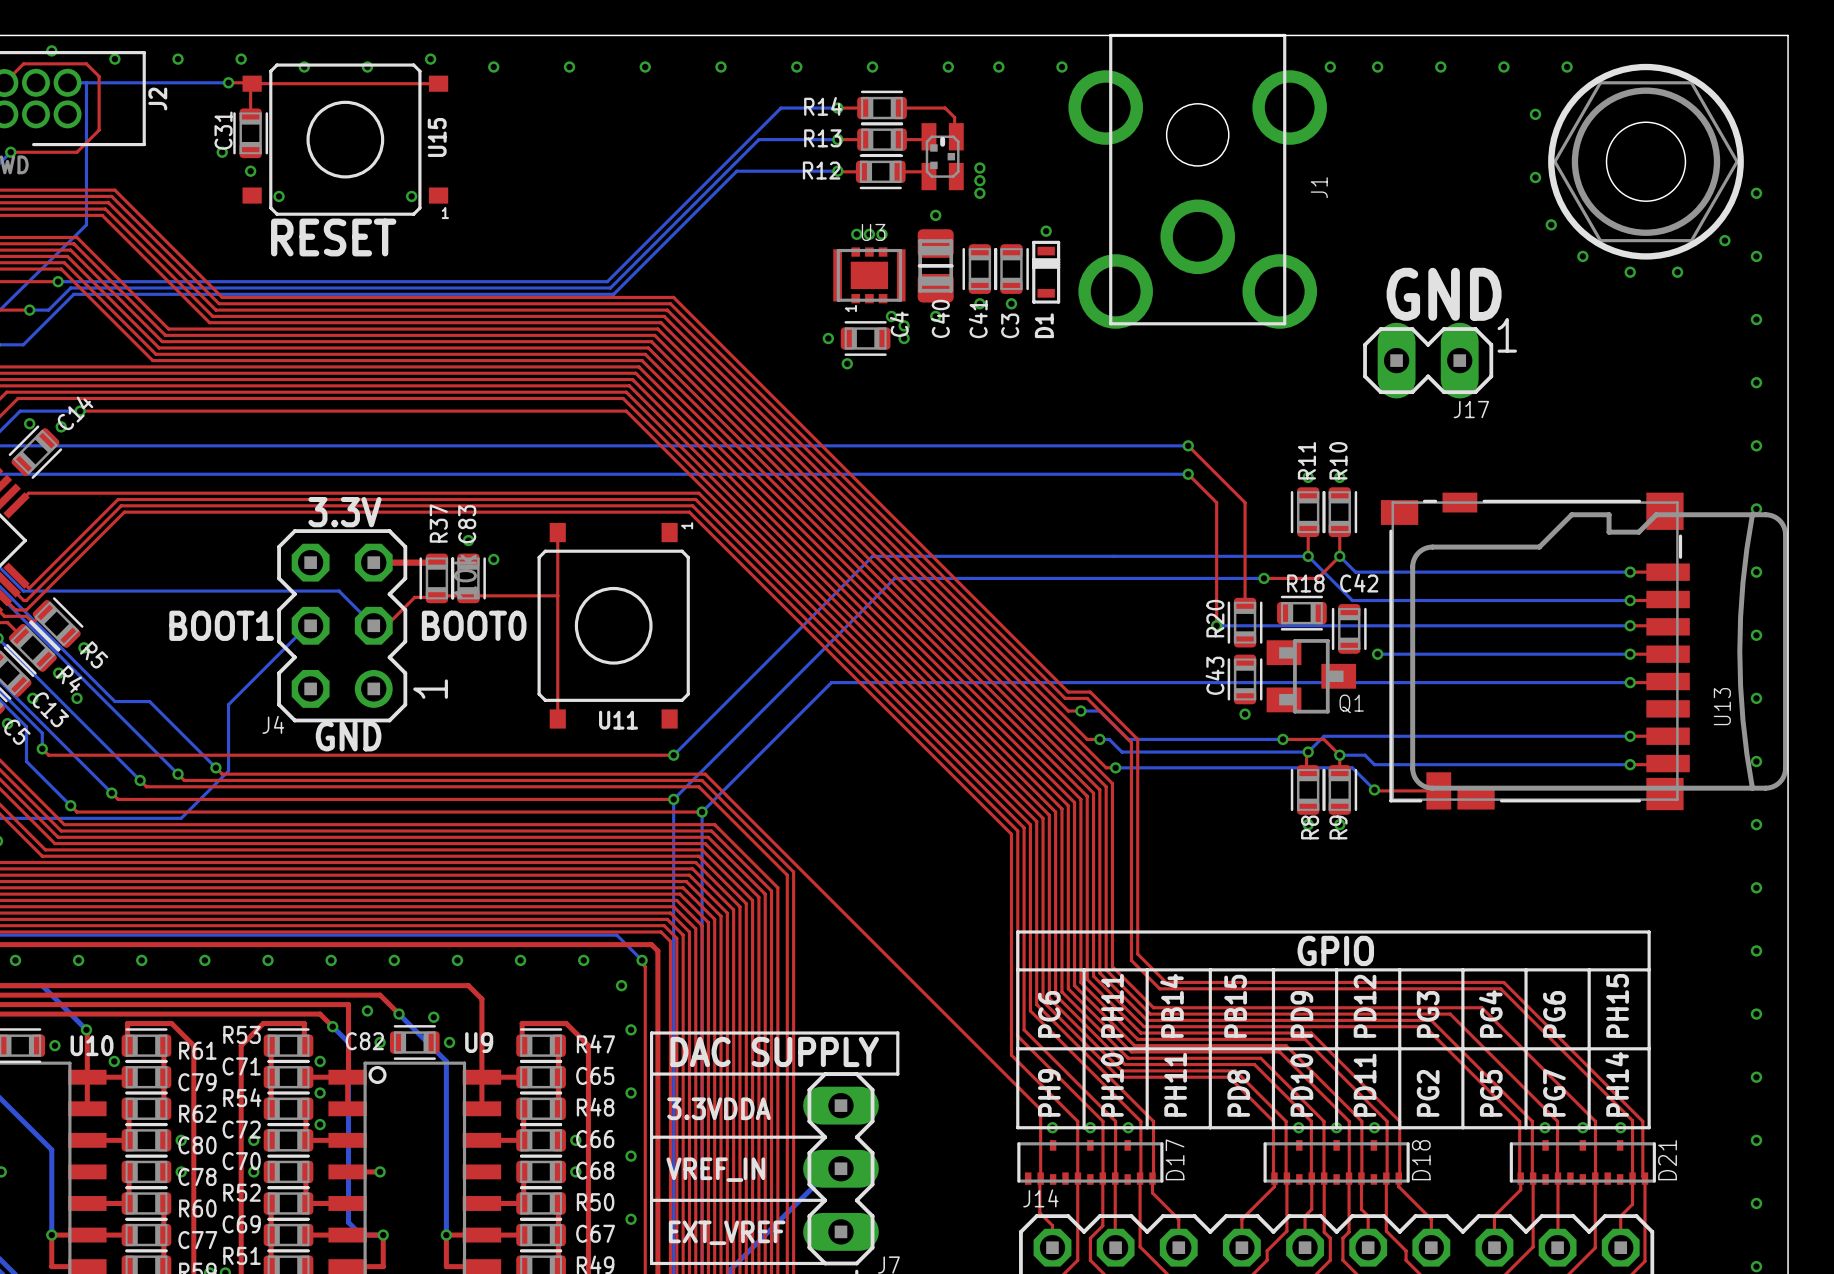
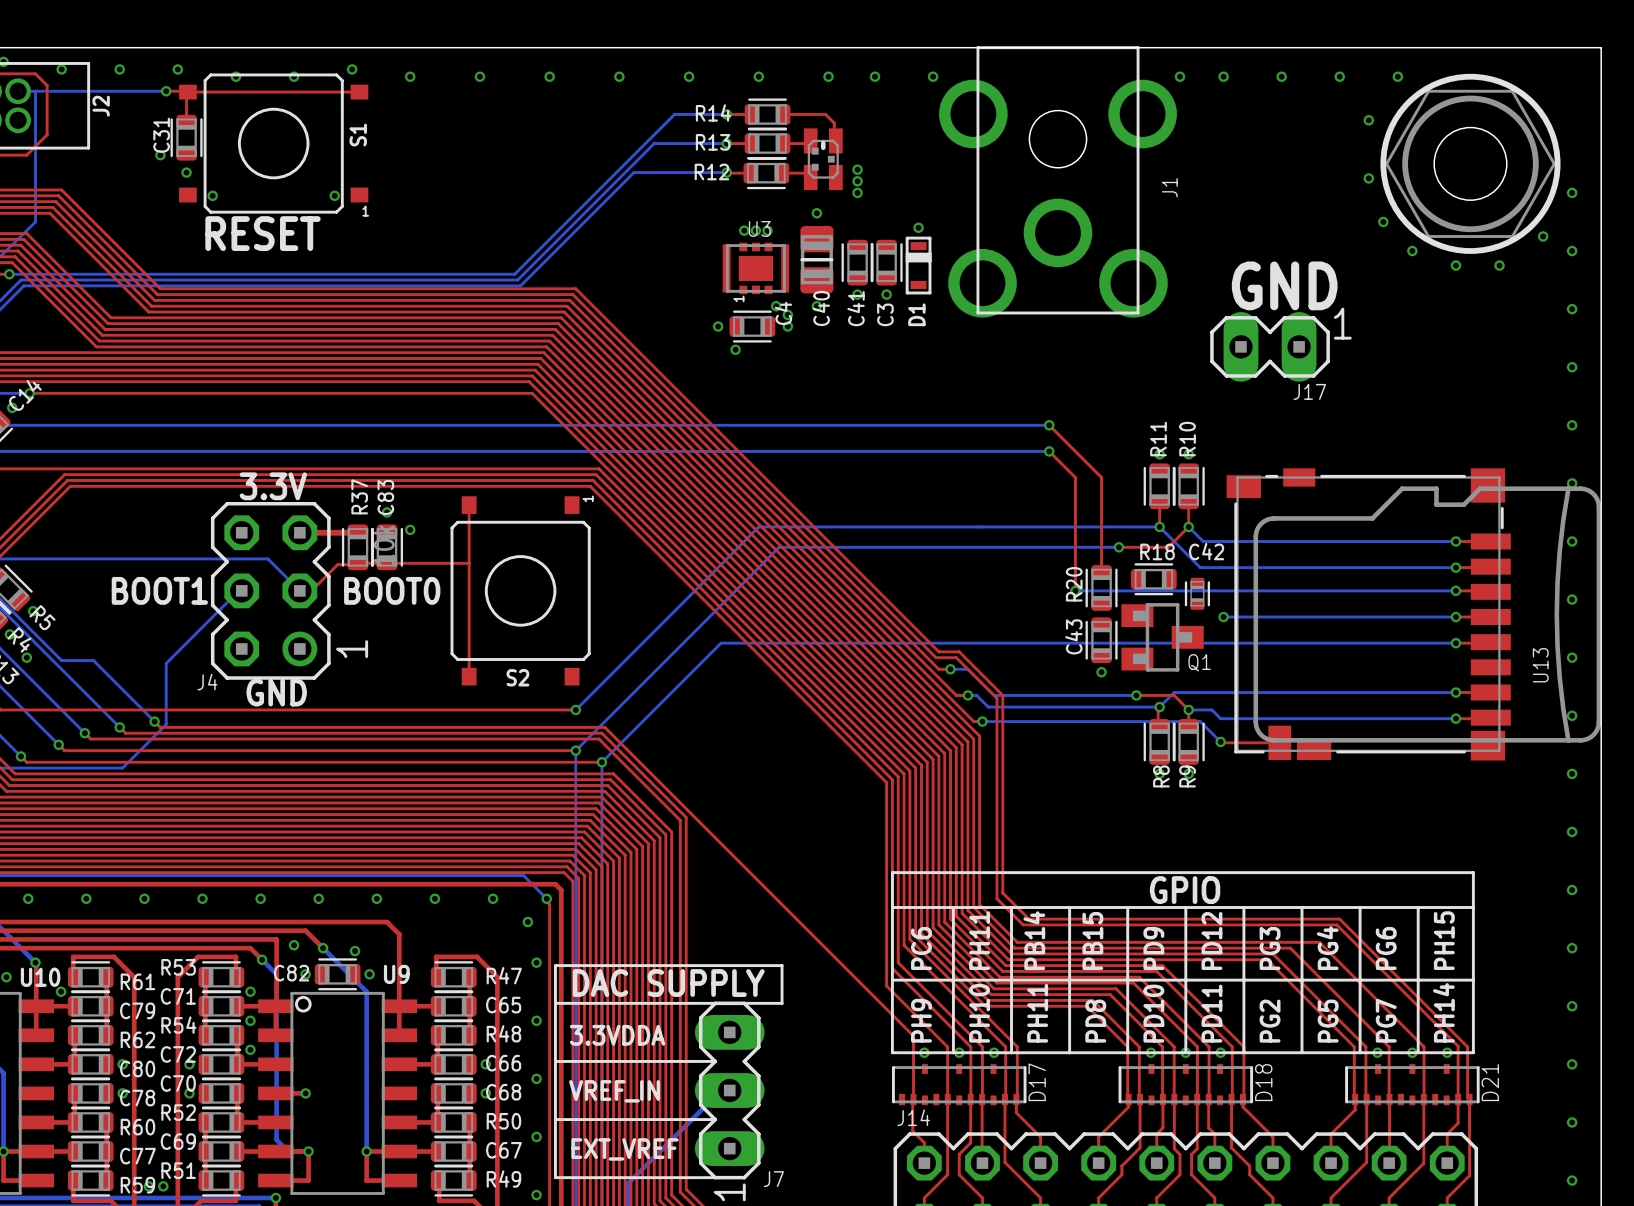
U15 name: U15 (437, 137) -> S1 (358, 135)
C42 footprint: [1331, 604, 1367, 654] -> [1184, 577, 1211, 610]
U11 name: U11 (618, 720) -> S2 (517, 677)

